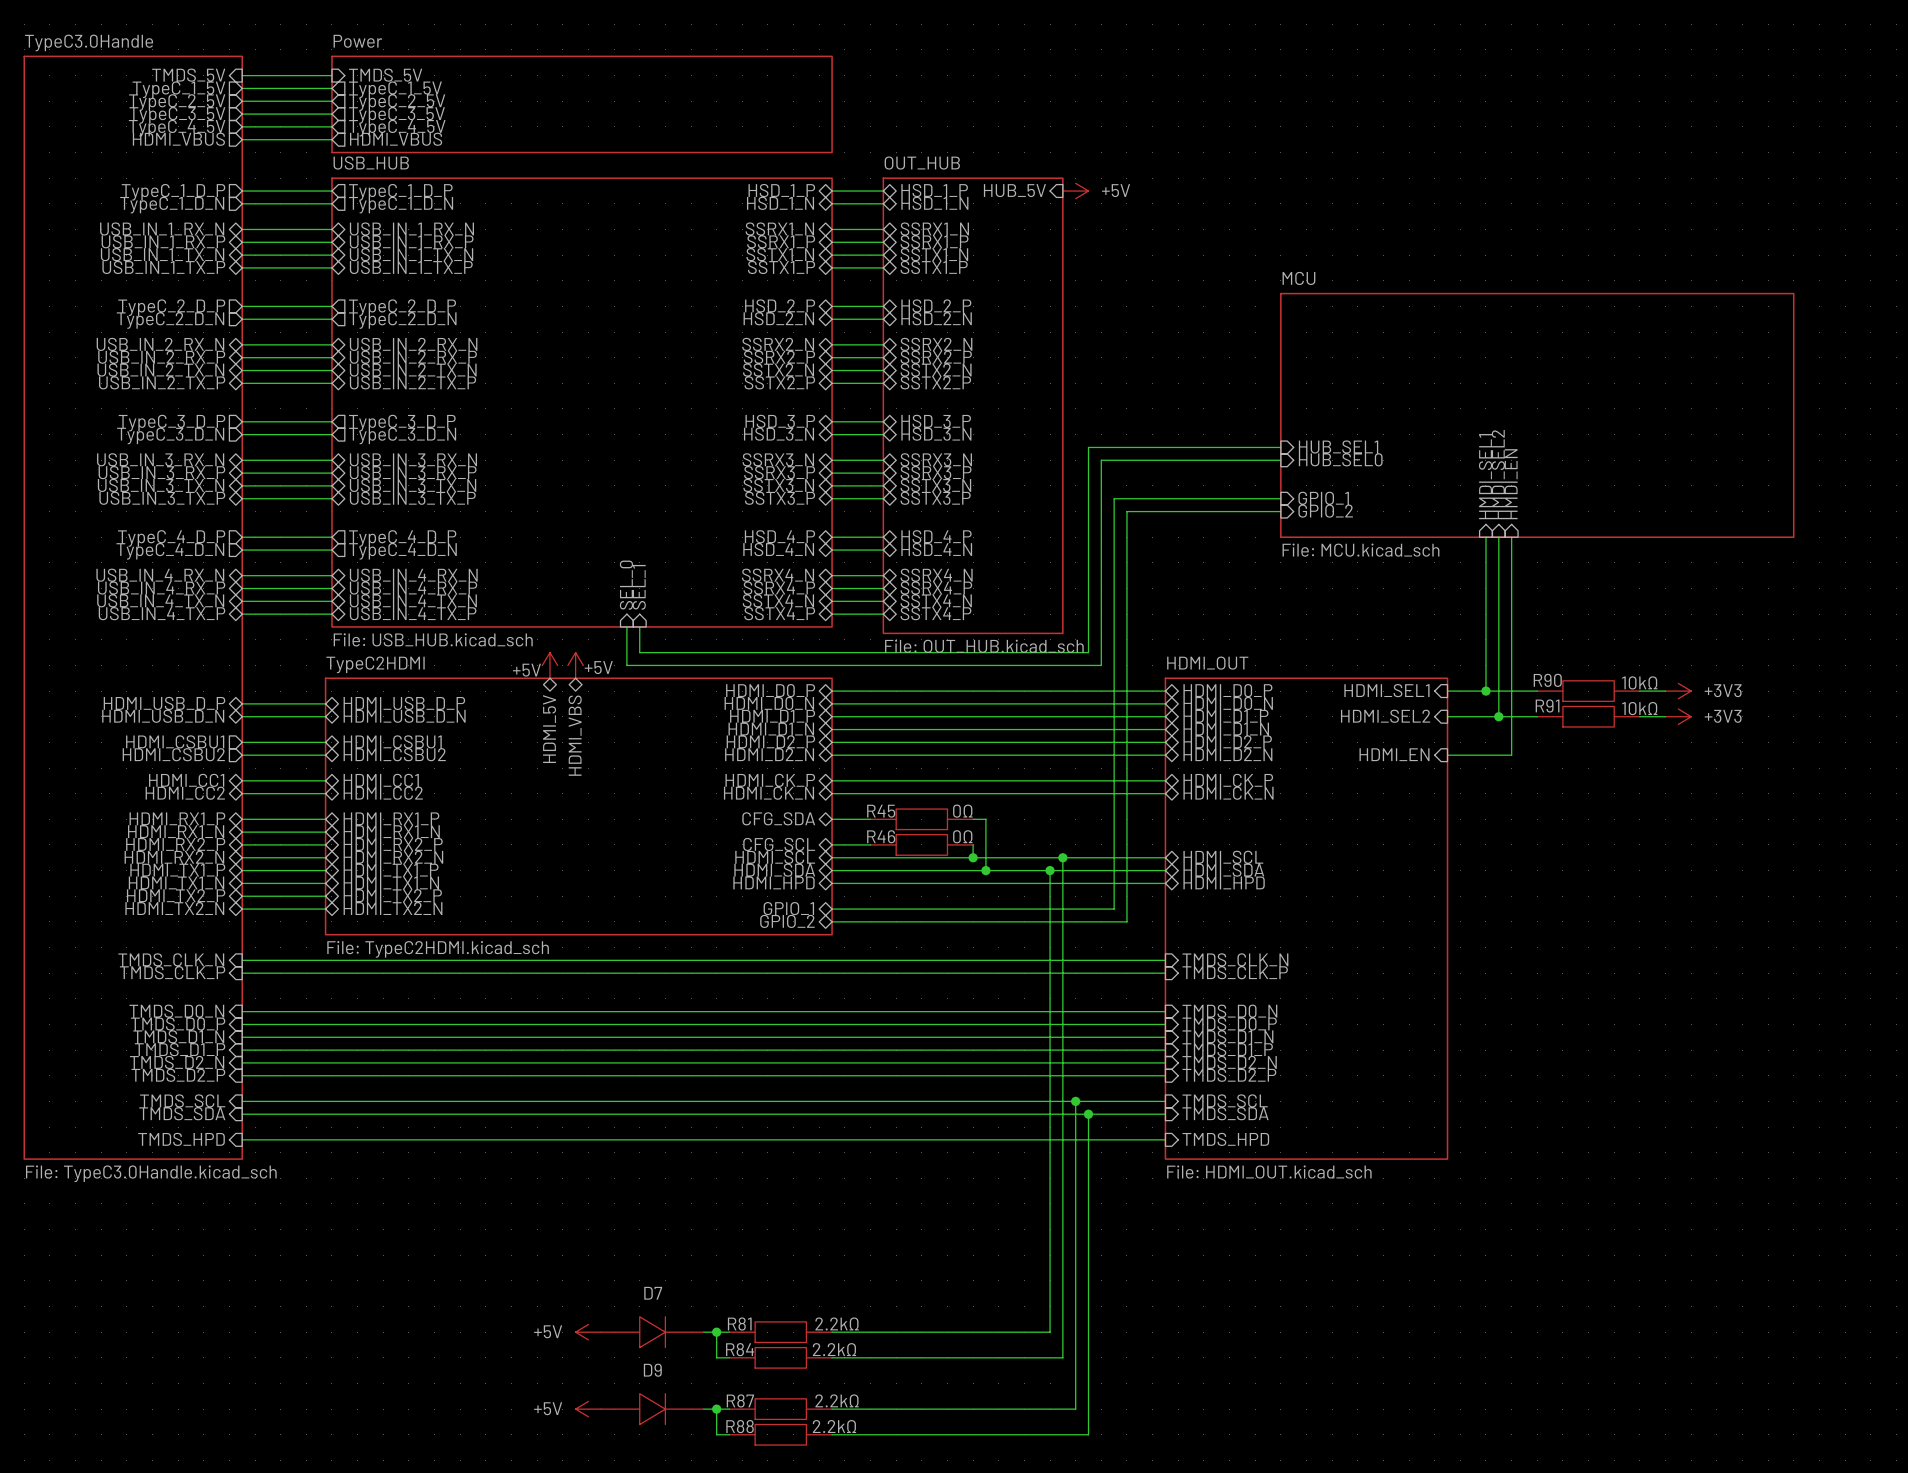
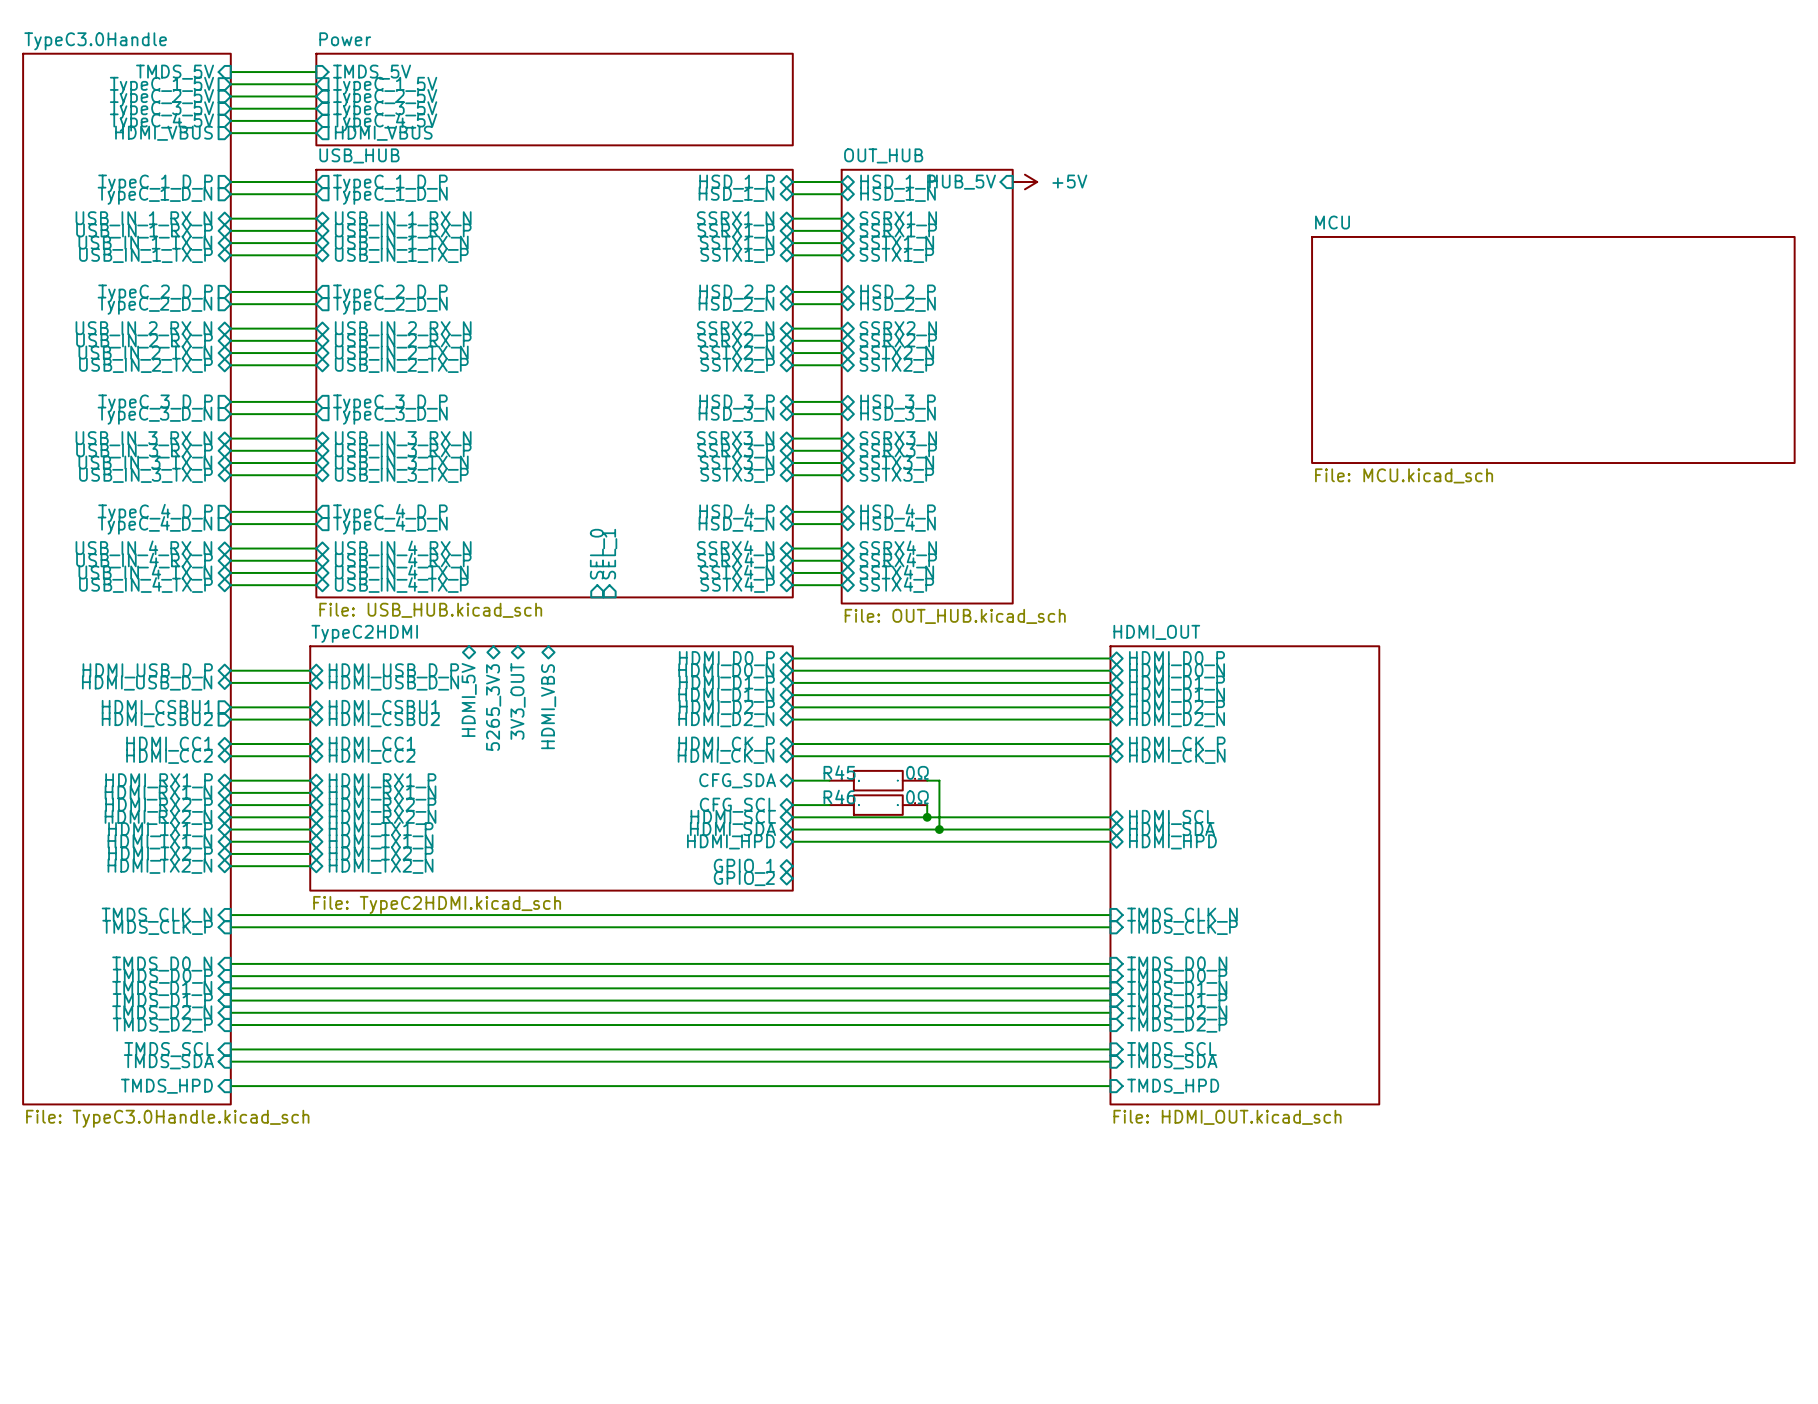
sheet MCU: none -> File: MCU.kicad_sch (1553, 349)
sheet MCU: File: MCU.kicad_sch (1537, 415) -> none
sheet pin: HUB_SEL1 (1338, 446) -> none
wire: (1280, 447) (1088, 447) (1088, 652) (639, 652) (639, 626) -> none
sheet pin: HUB_SEL0 (1340, 459) -> none
wire: (1280, 460) (1101, 460) (1101, 665) (626, 665) (626, 626) -> none
sheet pin: HMDI_SEL2 (1498, 474) -> none
sheet pin: HMDI_SEL1 (1485, 476) -> none
sheet pin: HMDI_EN (1511, 484) -> none
wire: (1280, 498) (1114, 498) (1114, 909) (832, 909) -> none
sheet pin: GPIO_1 (1323, 498) -> none
wire: (1280, 511) (1126, 511) (1126, 921) (832, 921) -> none
sheet pin: GPIO_2 (1325, 511) -> none
wire: (1485, 537) (1485, 691) -> none
wire: (1498, 537) (1498, 716) -> none
wire: (1511, 537) (1511, 755) (1447, 755) -> none
power symbol: +5V (549, 665) -> none
power symbol: +5V (575, 665) -> none
sheet pin: HDMI_SEL1 (1386, 690) -> none
wire: (1447, 691) (1537, 691) -> none
junction: (1485, 691) -> none
R90: 10kΩ (1588, 691) -> none
wire: (1639, 691) (1665, 691) -> none
power symbol: +3V3 (1678, 691) -> none
sheet pin: HDMI_SEL2 (1385, 716) -> none
wire: (1447, 716) (1537, 716) -> none
junction: (1498, 716) -> none
R91: 10kΩ (1588, 716) -> none
wire: (1639, 716) (1665, 716) -> none
power symbol: +3V3 (1678, 716) -> none
sheet pin position: HDMI_5V (549, 729) -> HDMI_5V (469, 699)
sheet pin: none -> 3V3_OUT (518, 701)
sheet pin: none -> 5265_3V3 (493, 707)
sheet pin: HDMI_EN (1394, 754) -> none
wire: (1062, 857) (1062, 1357) (832, 1357) -> none
junction: (1062, 857) -> none
wire: (1050, 870) (1050, 1332) (832, 1332) -> none
junction: (1050, 870) -> none
wire: (1075, 1101) (1075, 1409) (832, 1409) -> none
junction: (1075, 1101) -> none
wire: (1088, 1114) (1088, 1434) (832, 1434) -> none
junction: (1088, 1114) -> none
power symbol: +5V (588, 1332) -> none
D7: (652, 1332) -> none
wire: (703, 1332) (729, 1332) -> none
wire: (716, 1332) (716, 1357) (729, 1357) -> none
junction: (716, 1332) -> none
R81: 2.2kΩ (780, 1332) -> none
R84: 2.2kΩ (780, 1357) -> none
power symbol: +5V (588, 1409) -> none
D9: (652, 1409) -> none
wire: (703, 1409) (729, 1409) -> none
wire: (716, 1409) (716, 1434) (729, 1434) -> none
junction: (716, 1409) -> none
R87: 2.2kΩ (780, 1409) -> none
R88: 2.2kΩ (780, 1434) -> none

